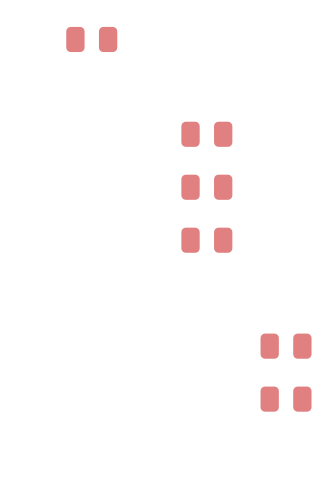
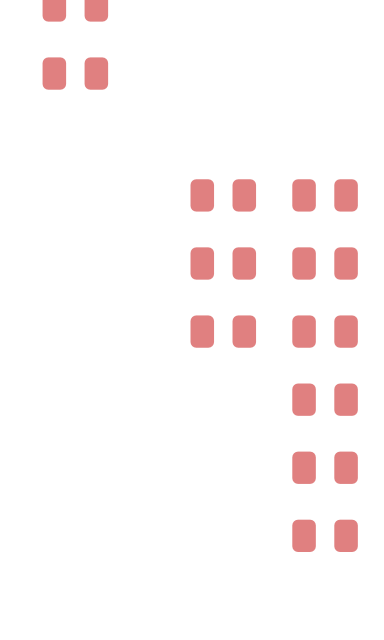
part: none -> (325, 195)
part: none -> (325, 263)
part: none -> (325, 331)
part: none -> (325, 399)

